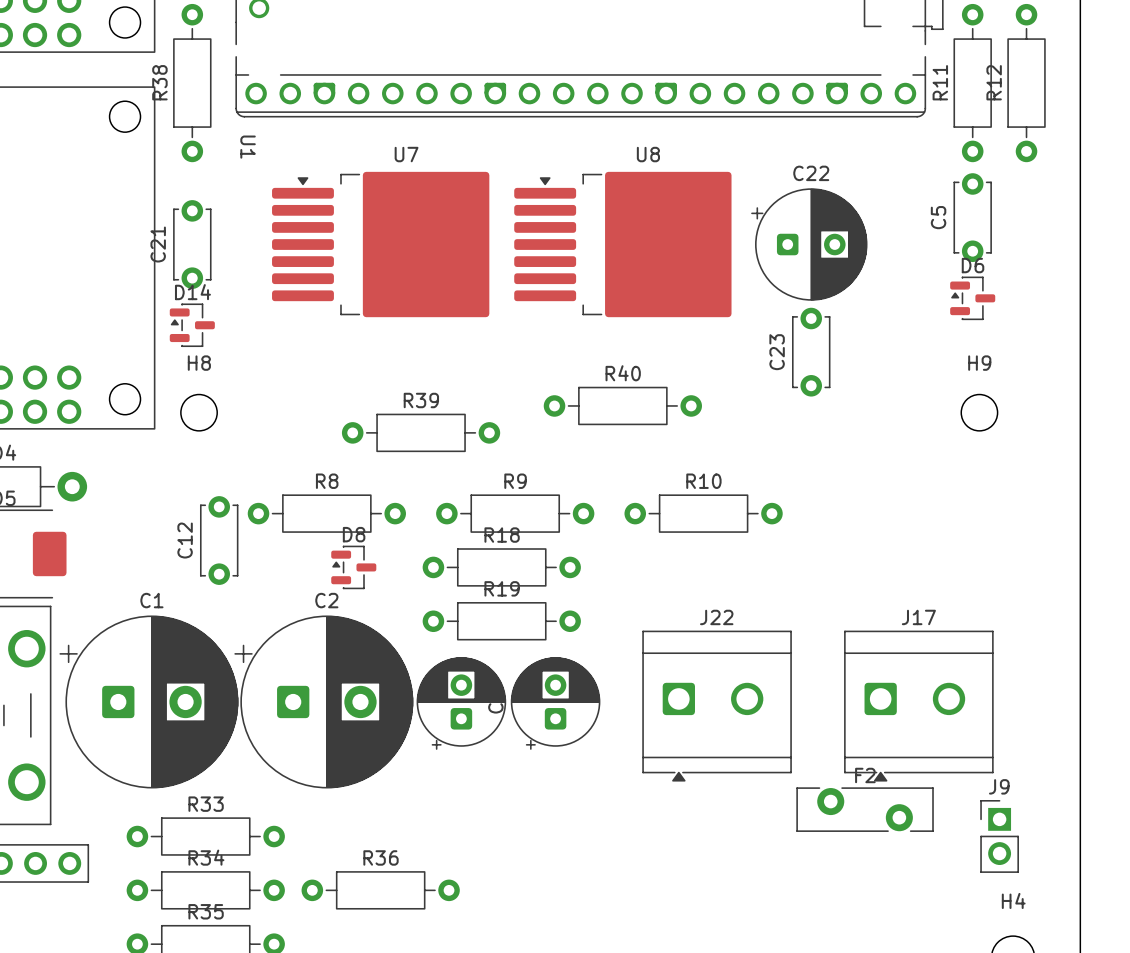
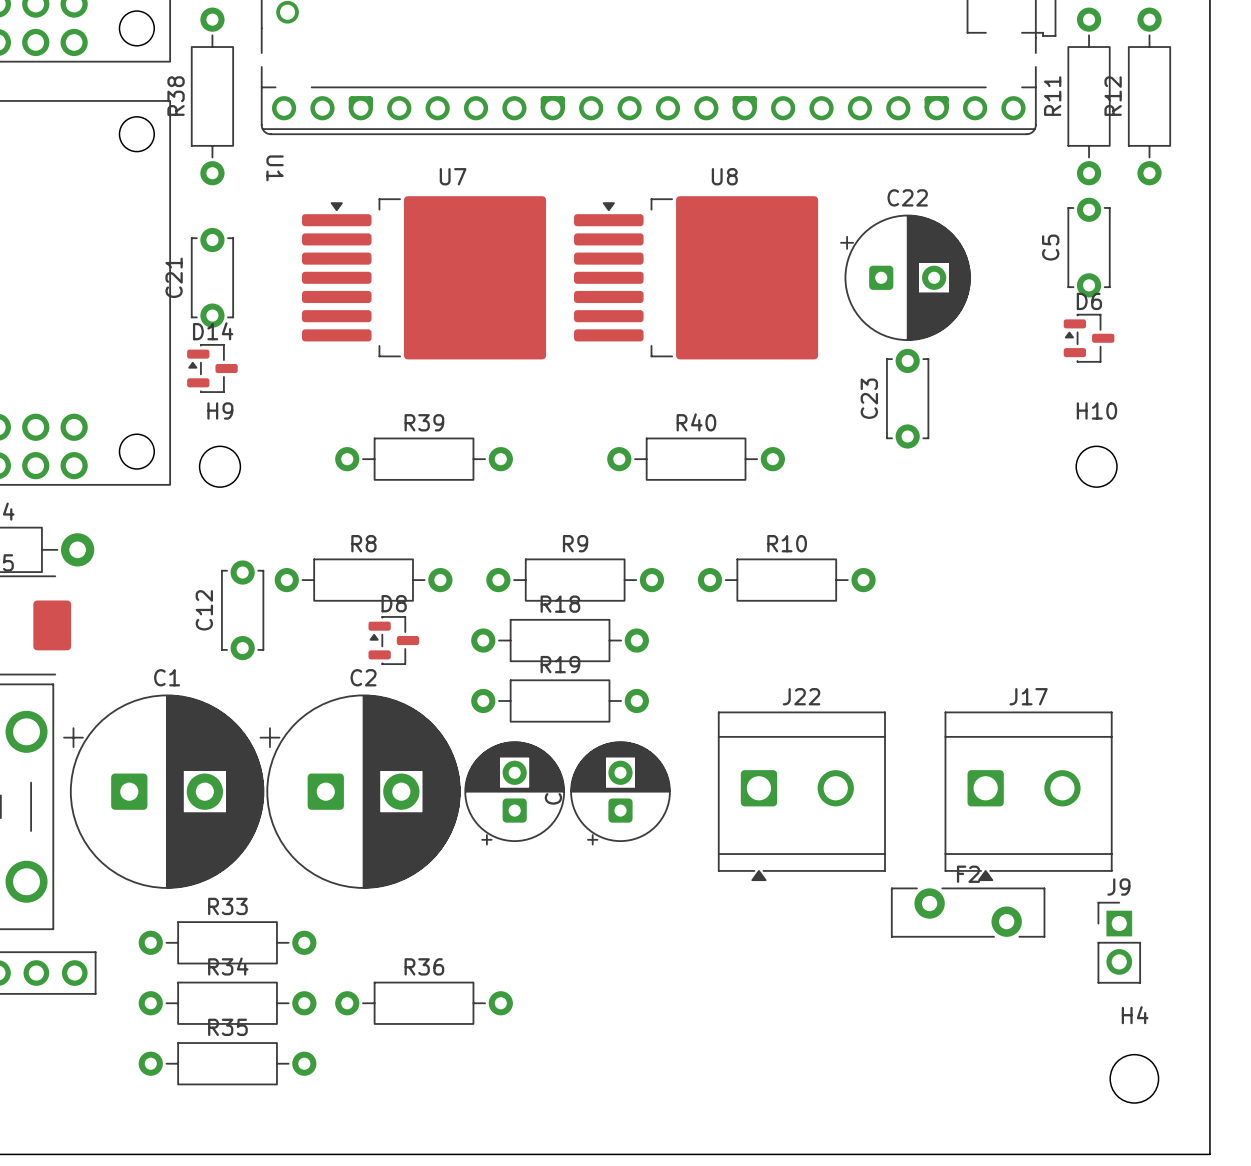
H8 name: H8 (199, 363) -> H9 (220, 410)
H9 name: H9 (979, 363) -> H10 (1096, 410)
R39 position: (421, 432) -> (424, 459)

